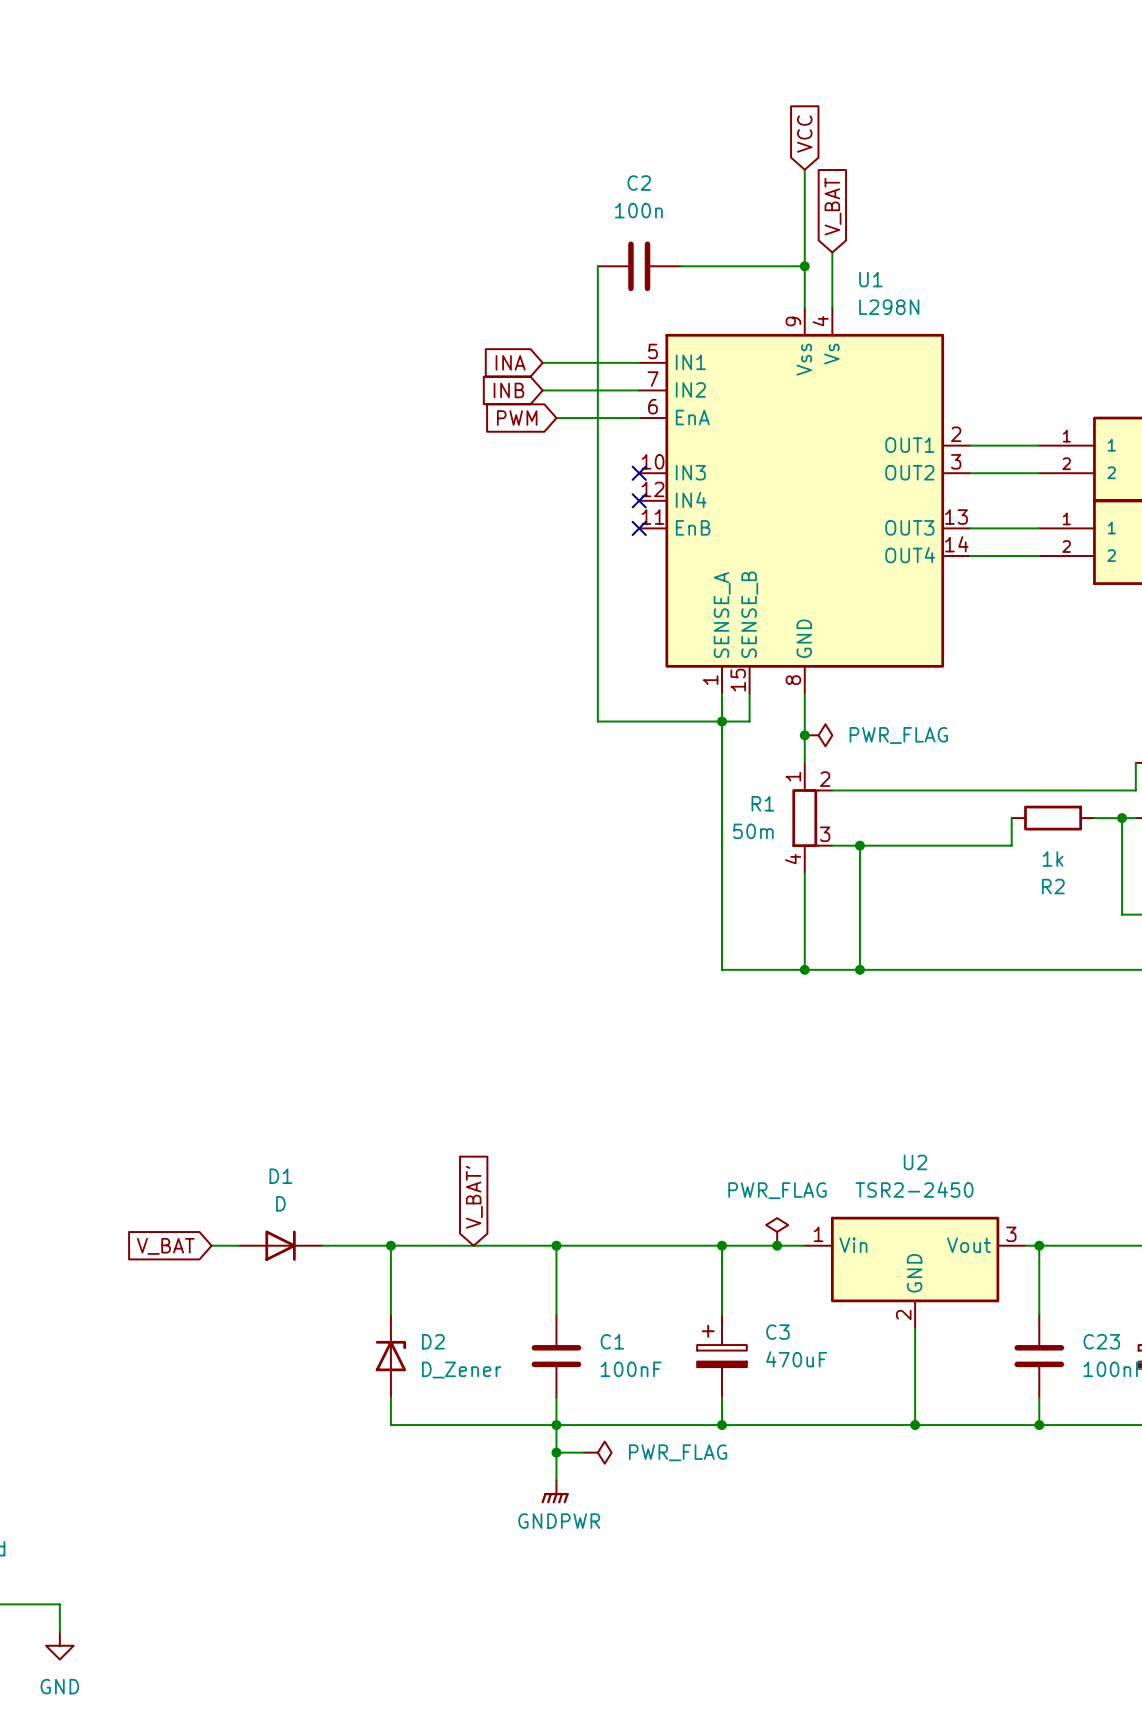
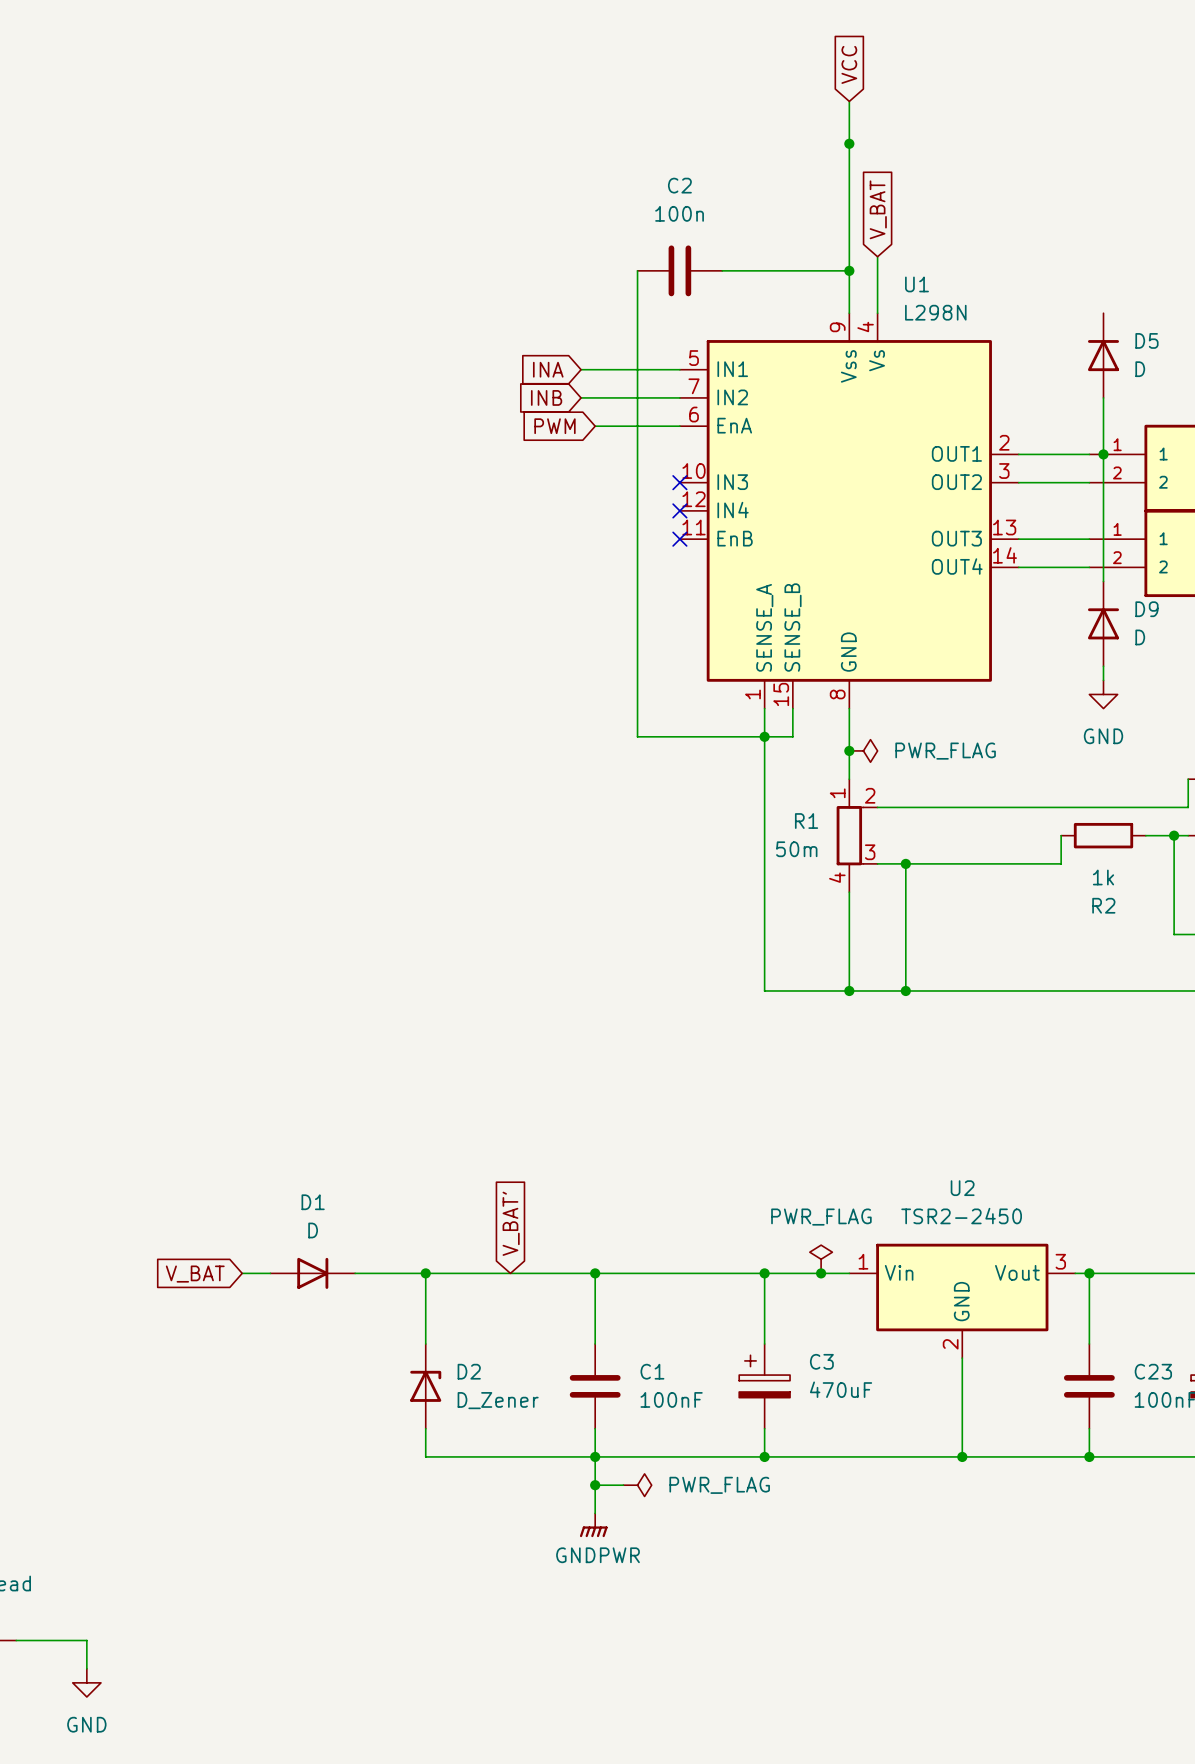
wire: none -> (849, 101) (849, 172)
global label position: VCC (804, 134) -> VCC (849, 64)
junction: none -> (849, 143)
D5: none -> D (1103, 355)
wire: none -> (1103, 397) (1103, 581)
junction: none -> (1103, 454)
D9: none -> D (1103, 623)
wire: none -> (1103, 666) (1103, 680)
power symbol: none -> GND (1103, 694)

